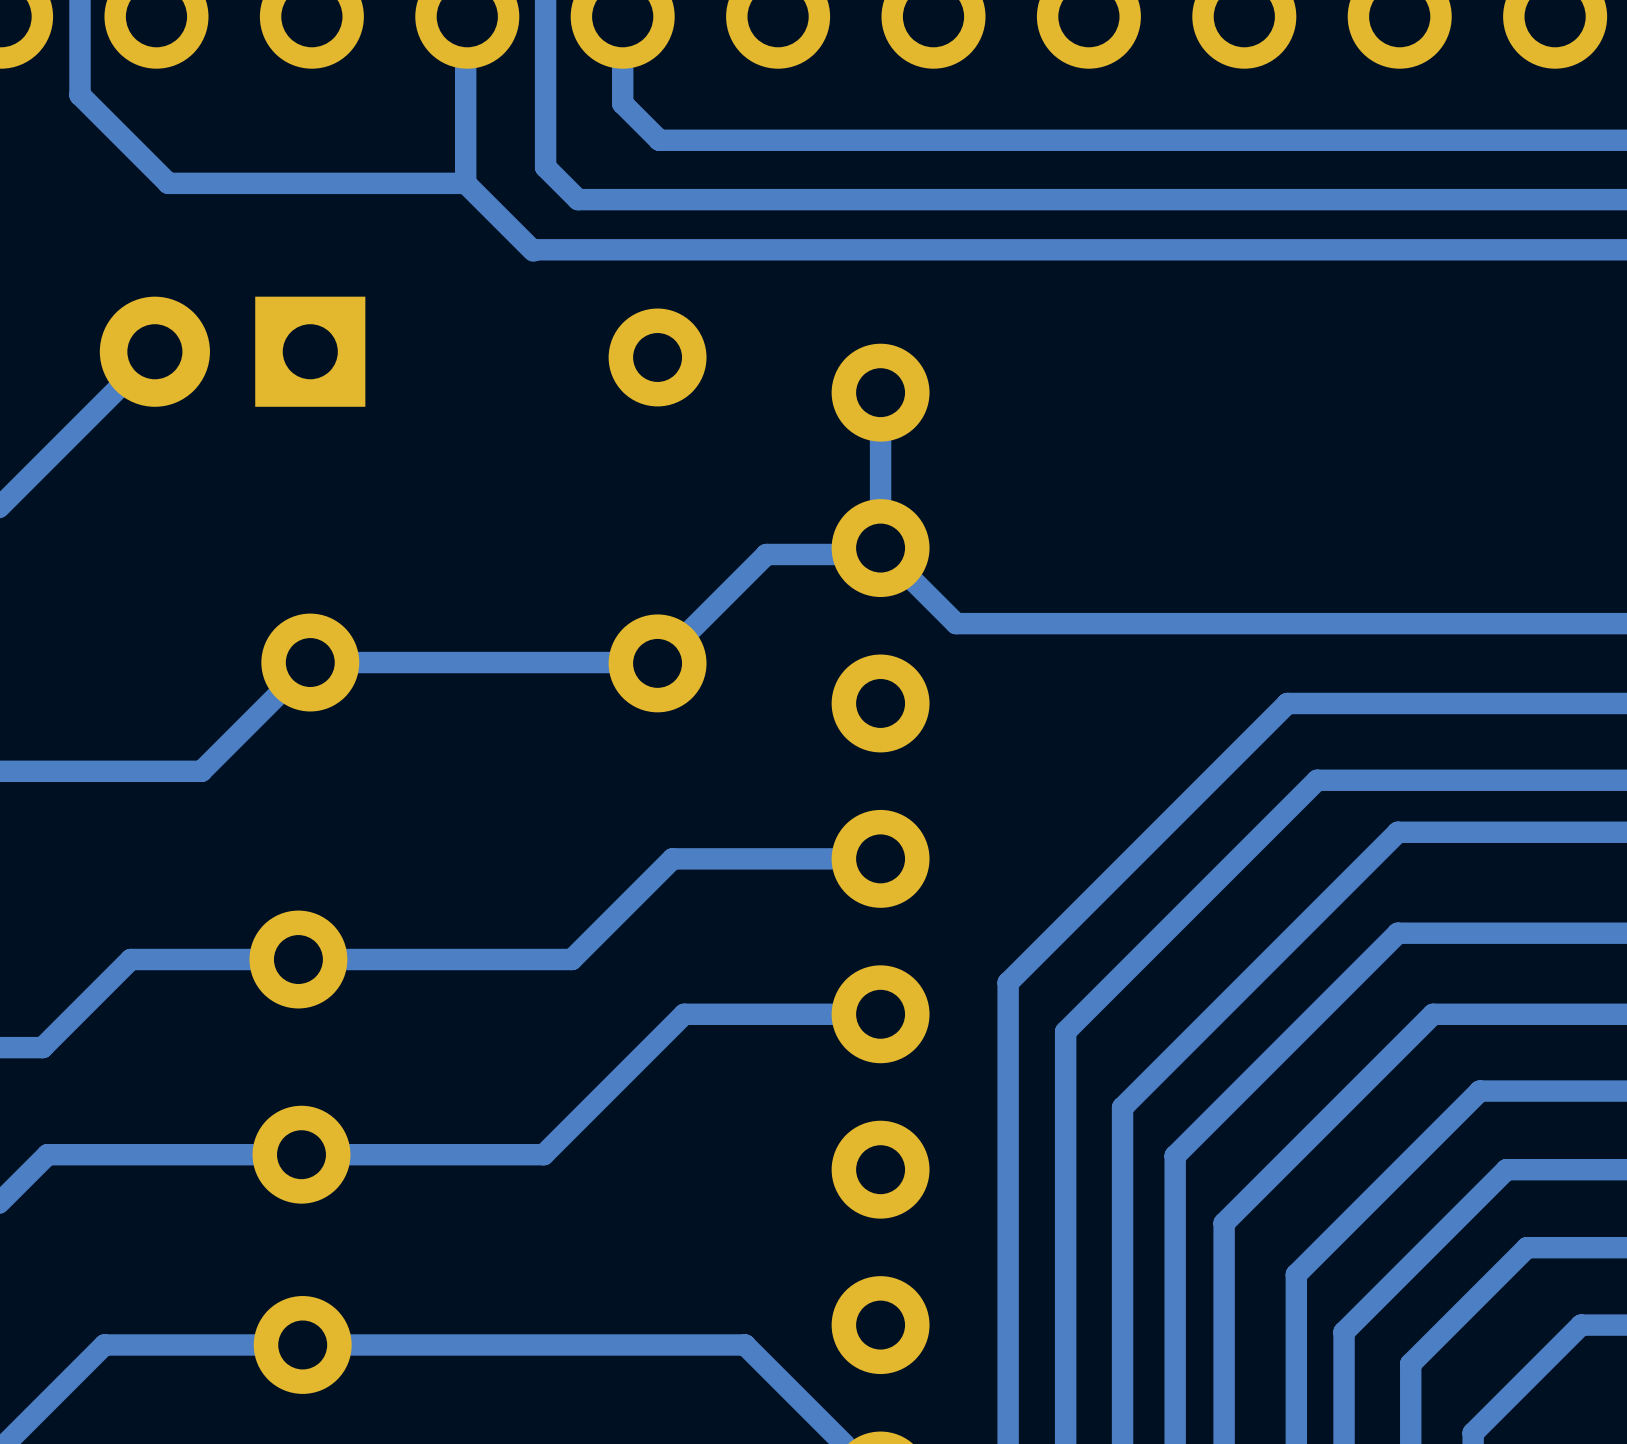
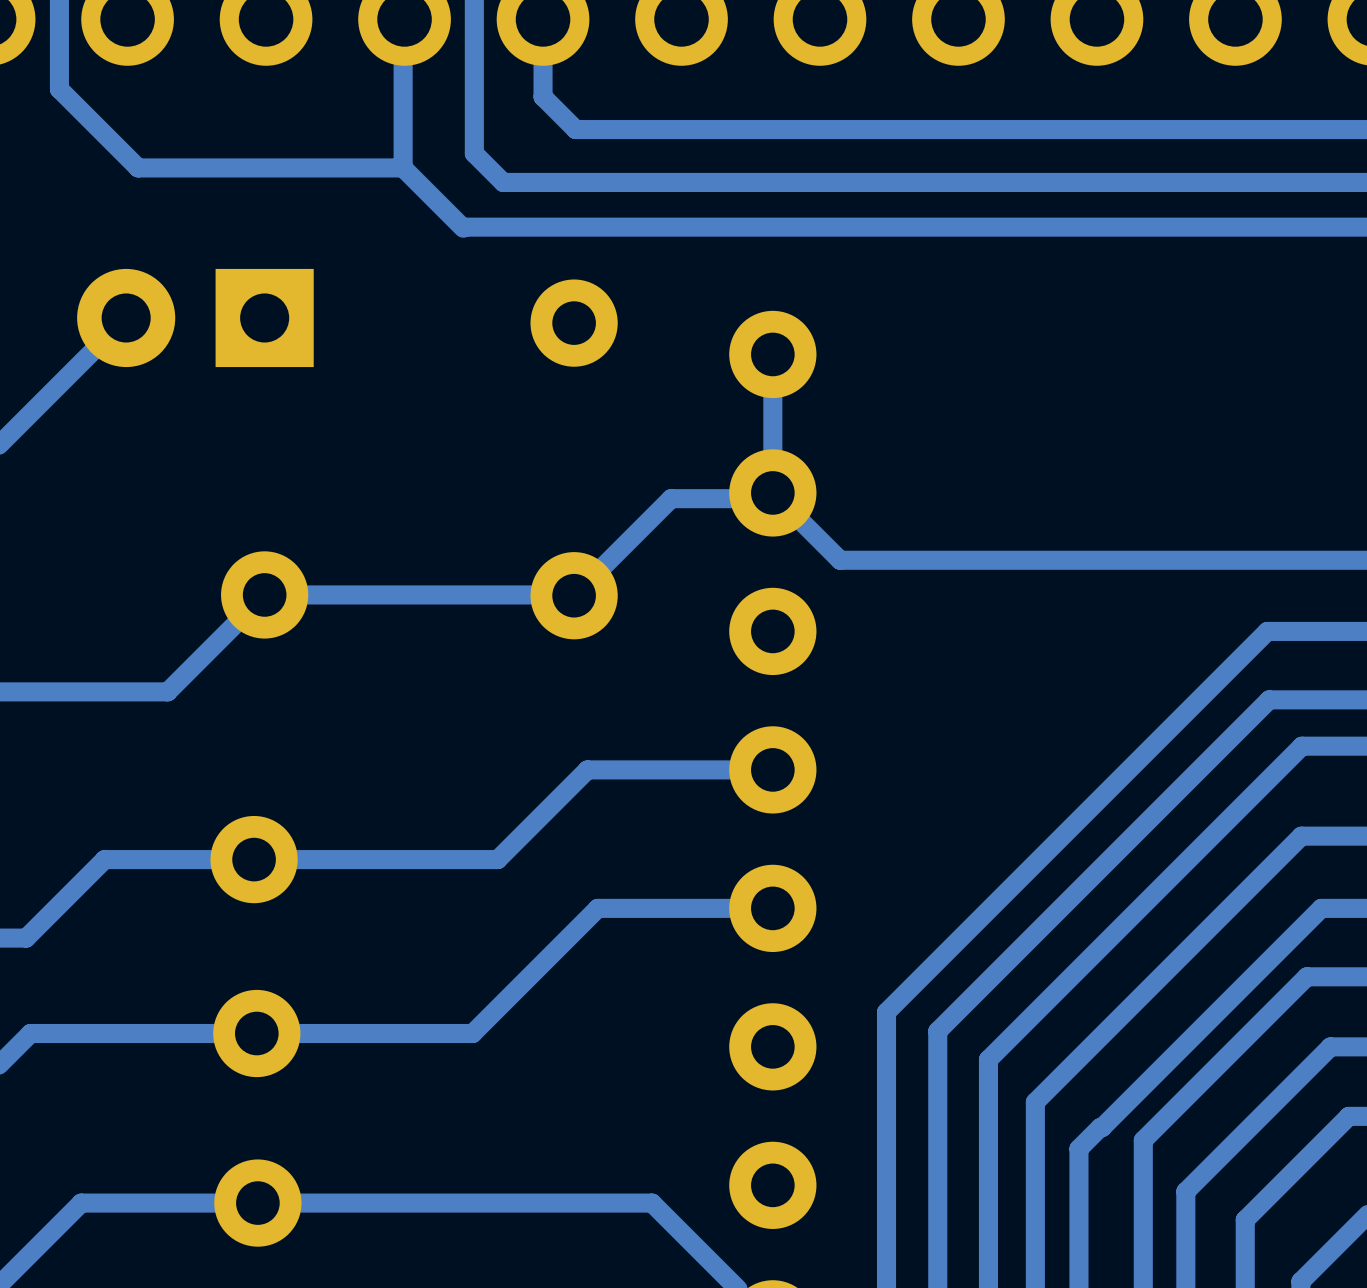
track: (1435, 703) (1287, 703) (1008, 982) (1008, 1130) -> (1267, 631) (886, 1012)
track: (1437, 780) (1317, 780) (1065, 1031) (1065, 1152) -> (1269, 699) (937, 1031)
track: (1474, 832) (1397, 832) (1122, 1107) (1122, 1184) -> (1301, 746) (988, 1059)
track: (1473, 933) (1397, 933) (1175, 1155) (1175, 1231) -> (1301, 836) (1035, 1102)
track: (1496, 1014) (1433, 1014) (1224, 1223) (1224, 1284) -> (1321, 908) (1078, 1148)

